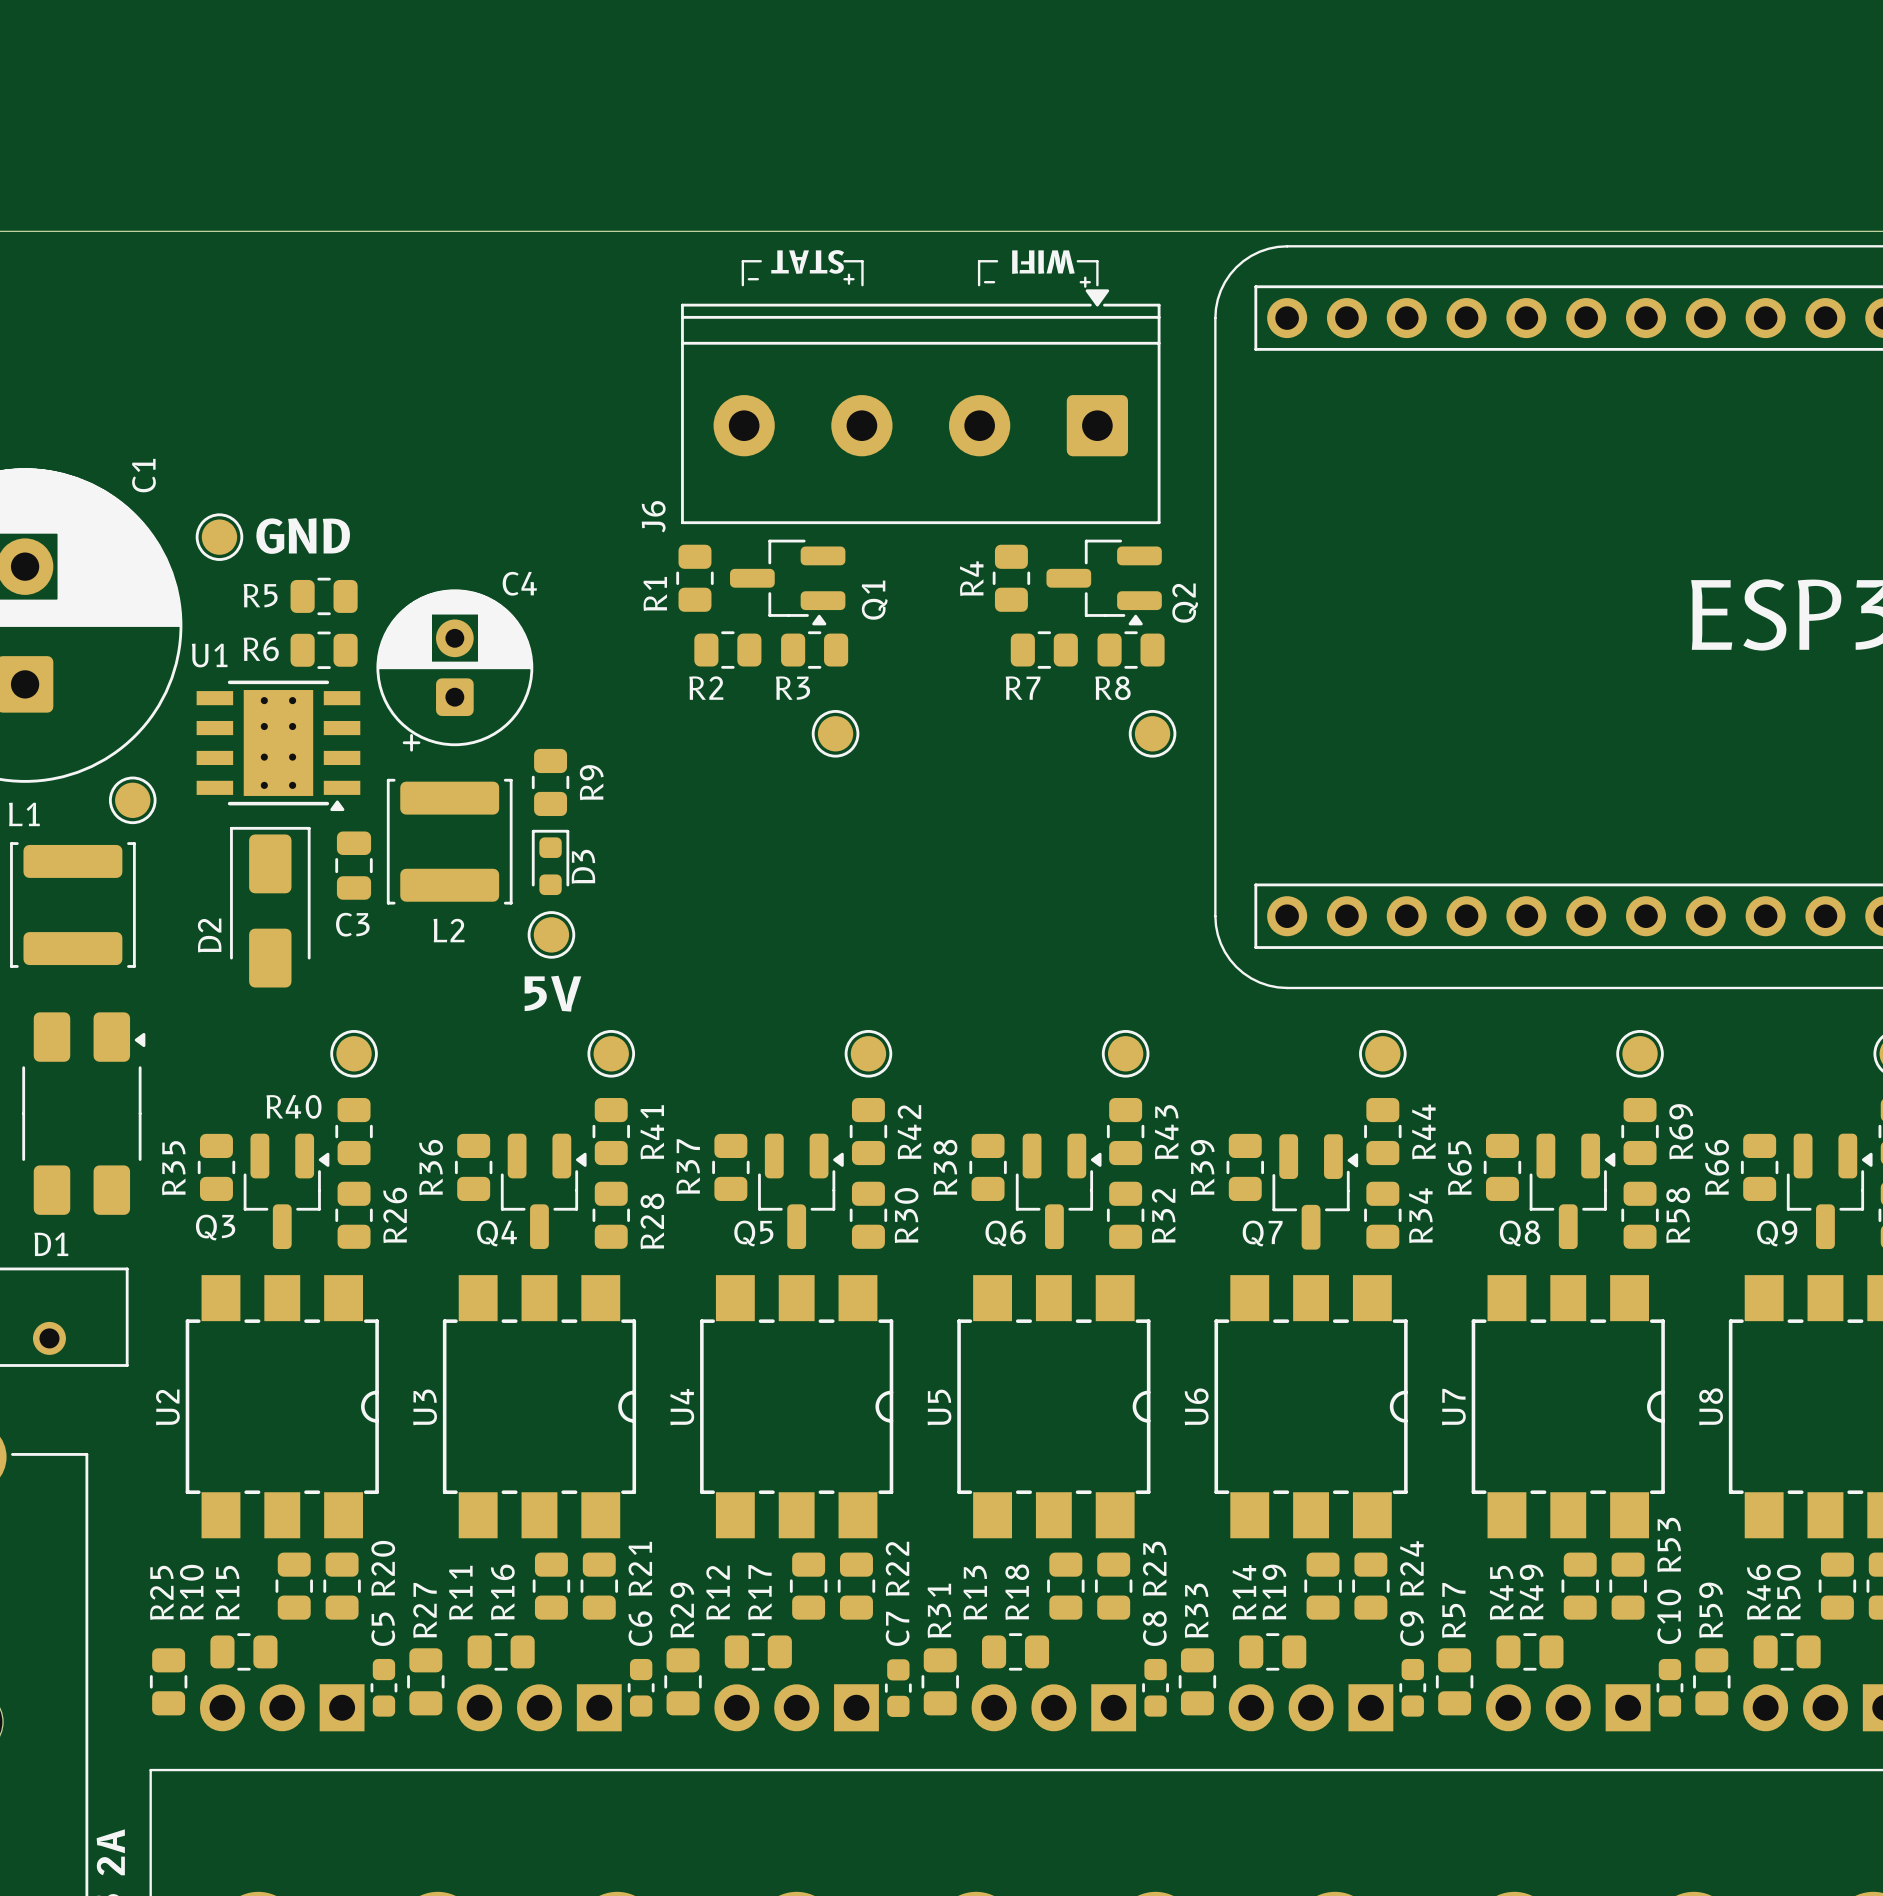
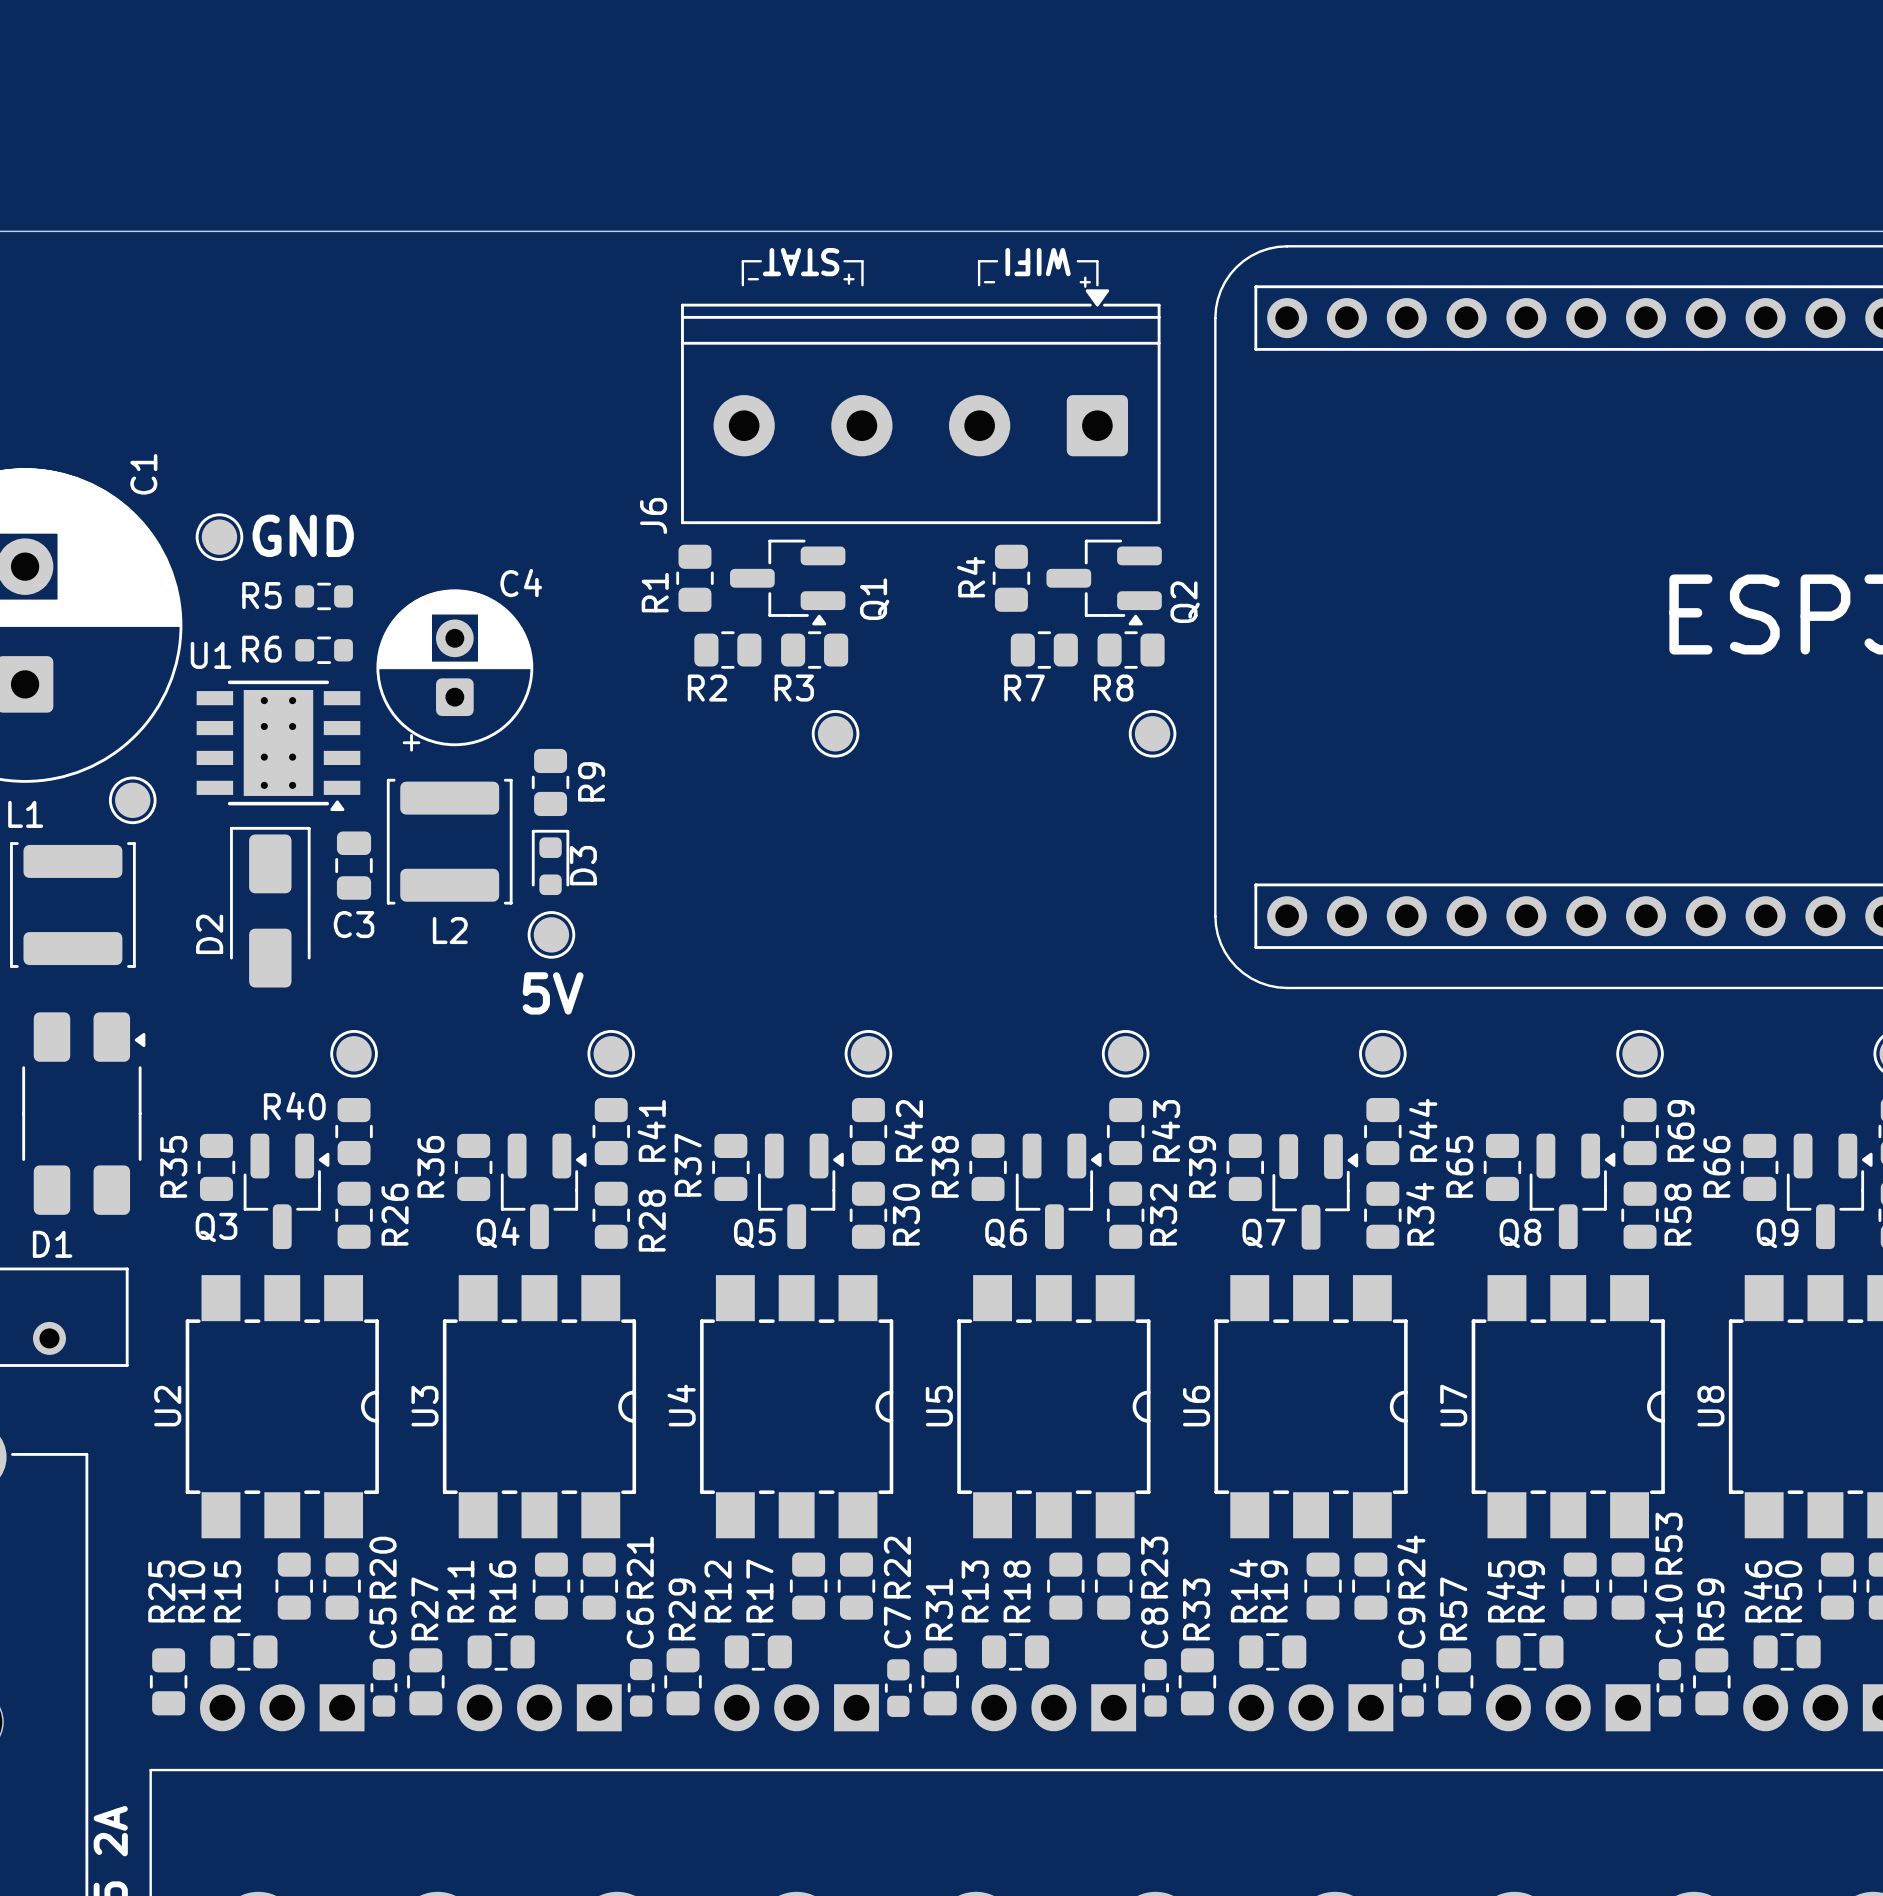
R5 footprint: [290, 577, 358, 616] -> [295, 582, 353, 611]
R6 footprint: [290, 631, 358, 670] -> [295, 636, 353, 664]

